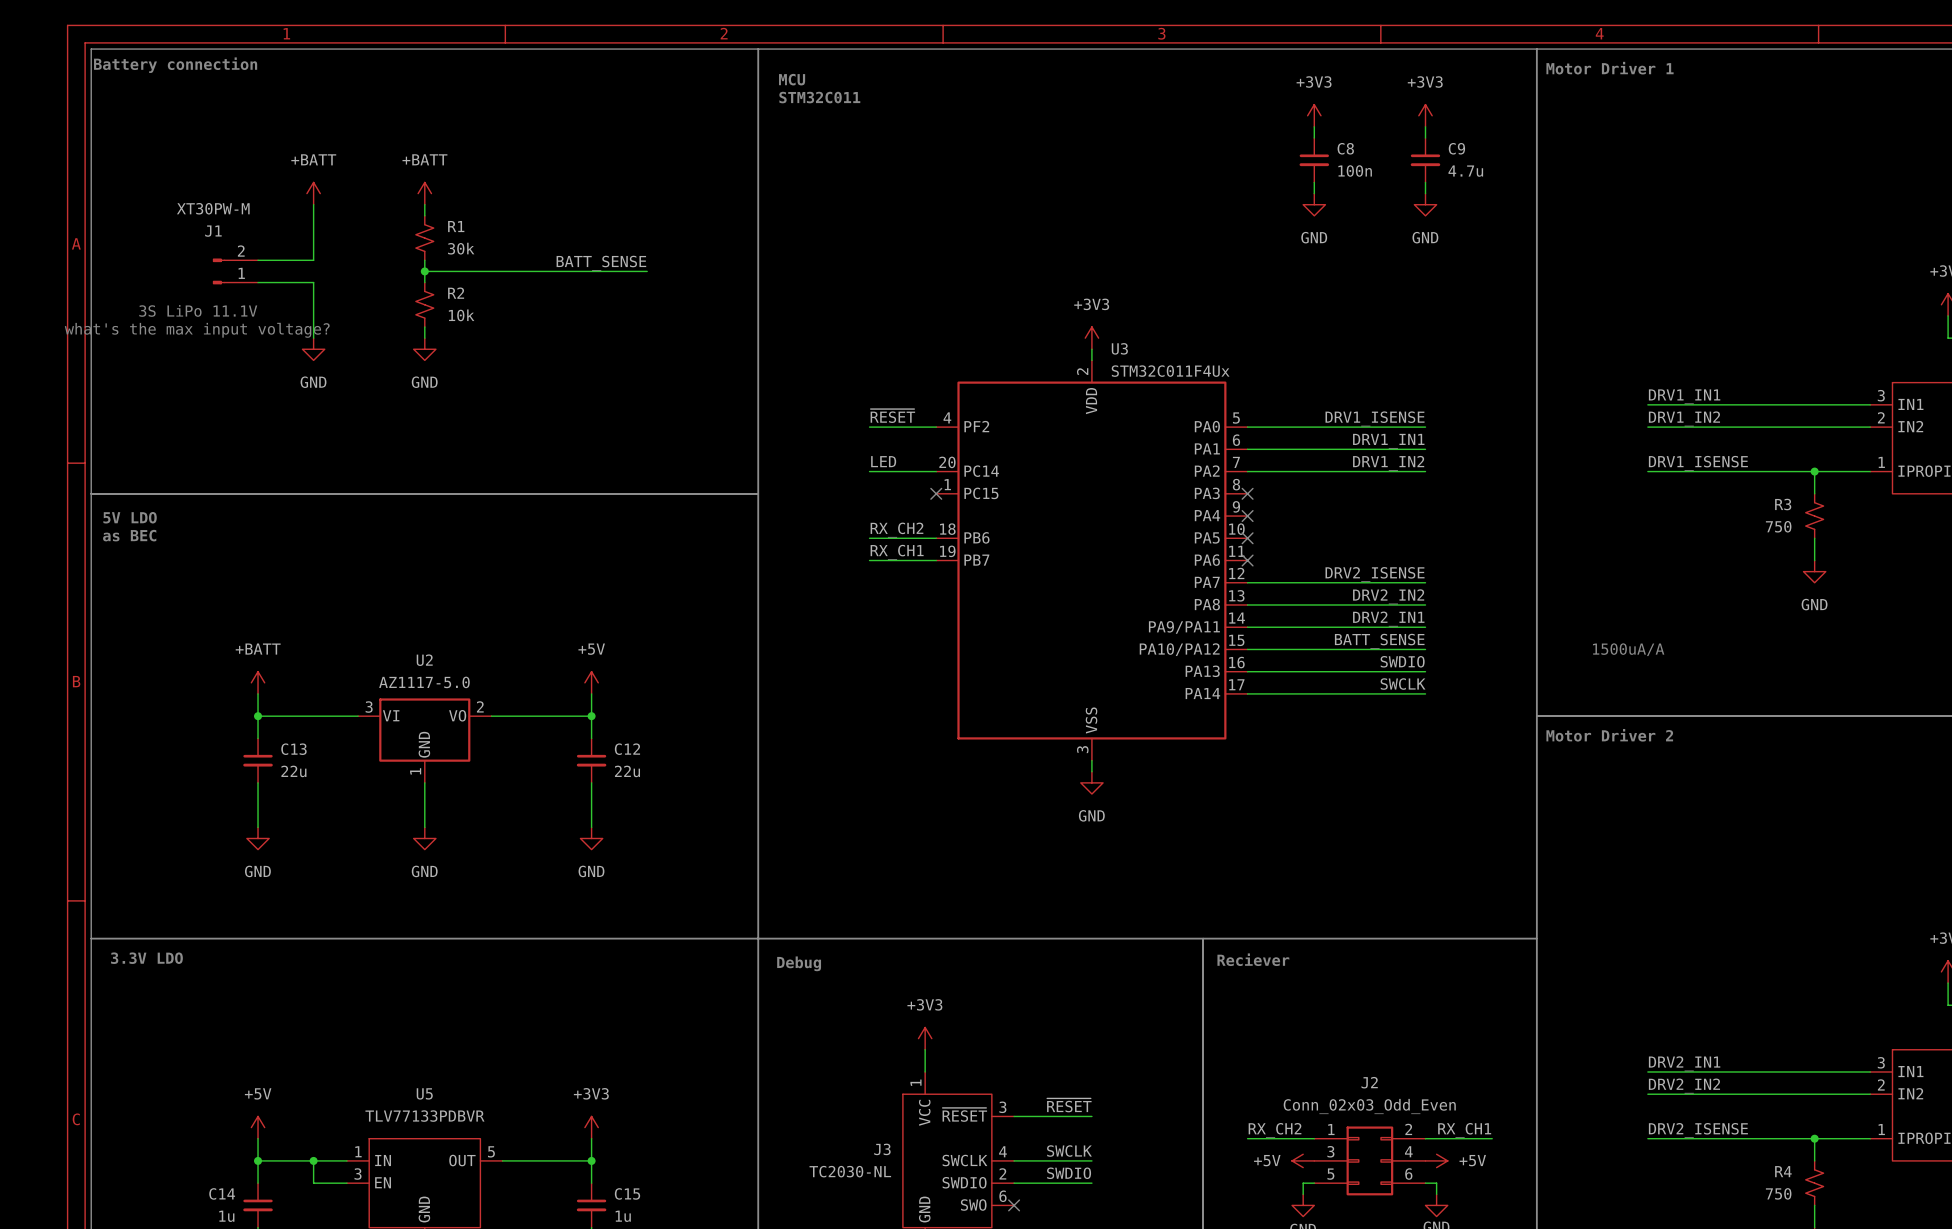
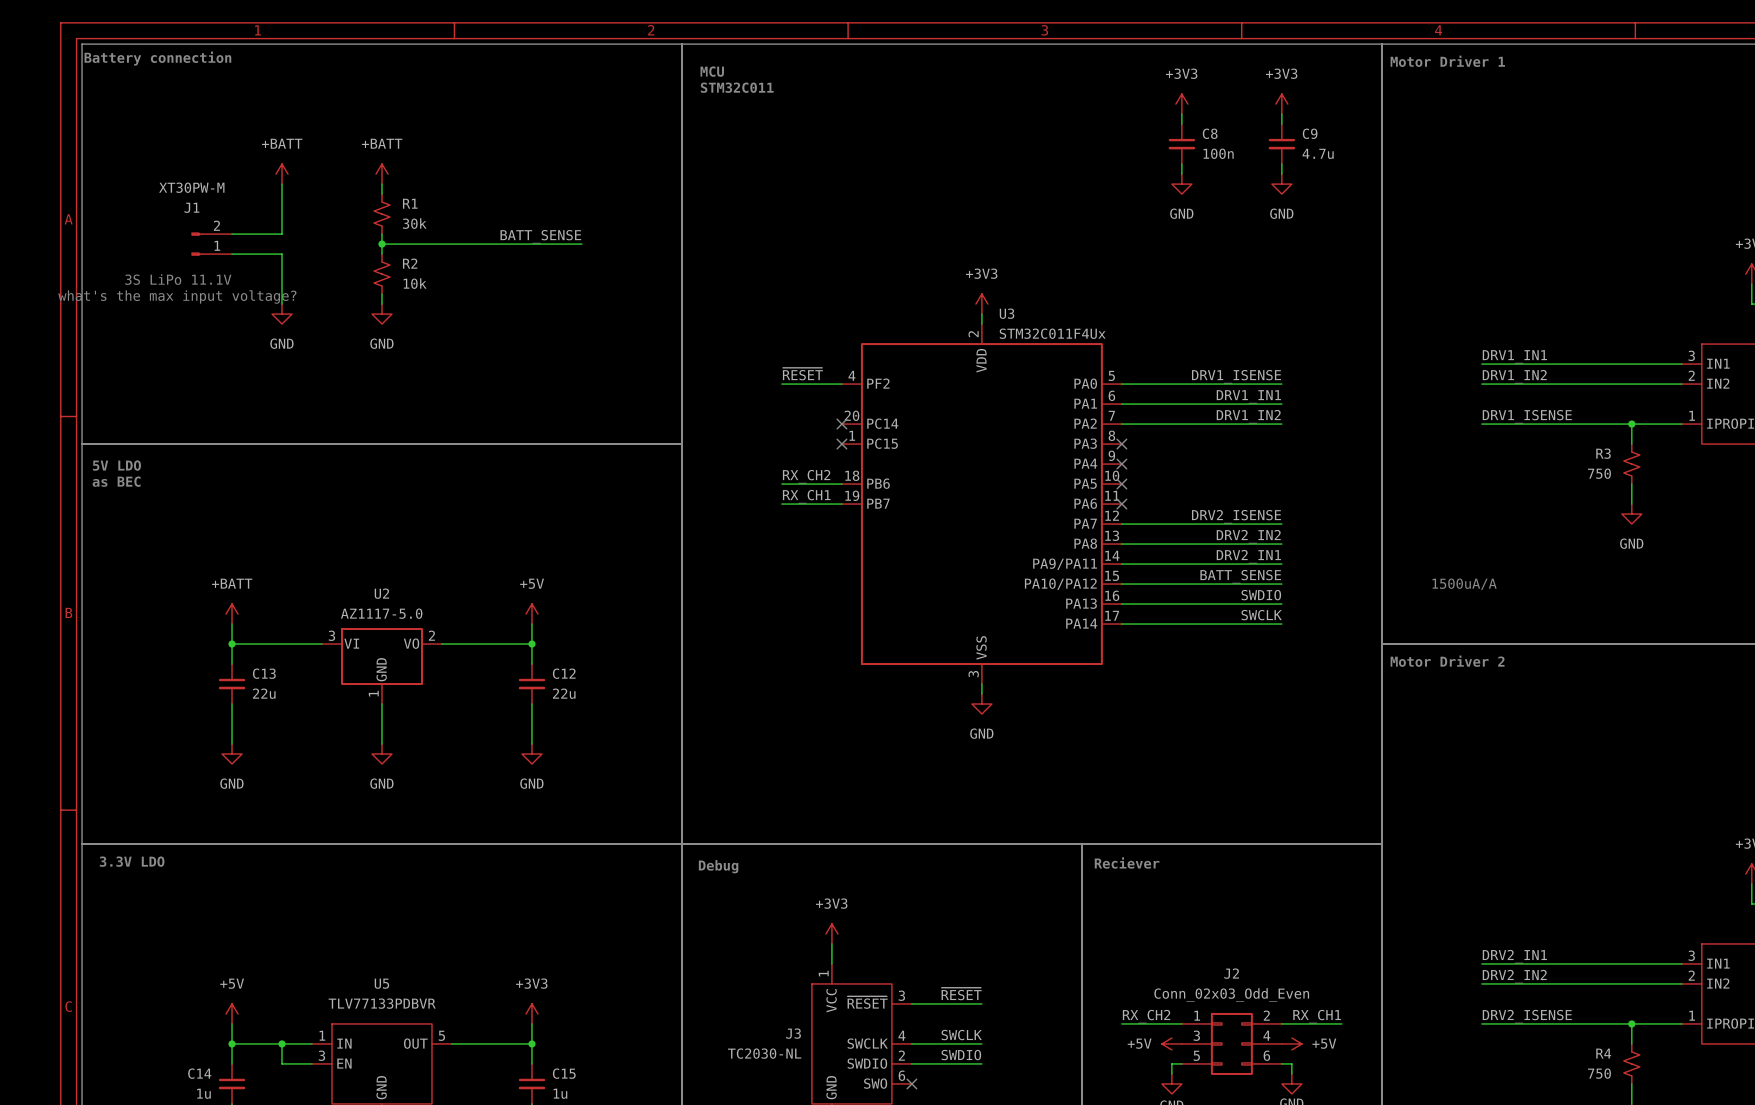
label: LED (883, 461) -> none
wire: (869, 471) (936, 471) -> none
no-connect mark: none -> (841, 424)

